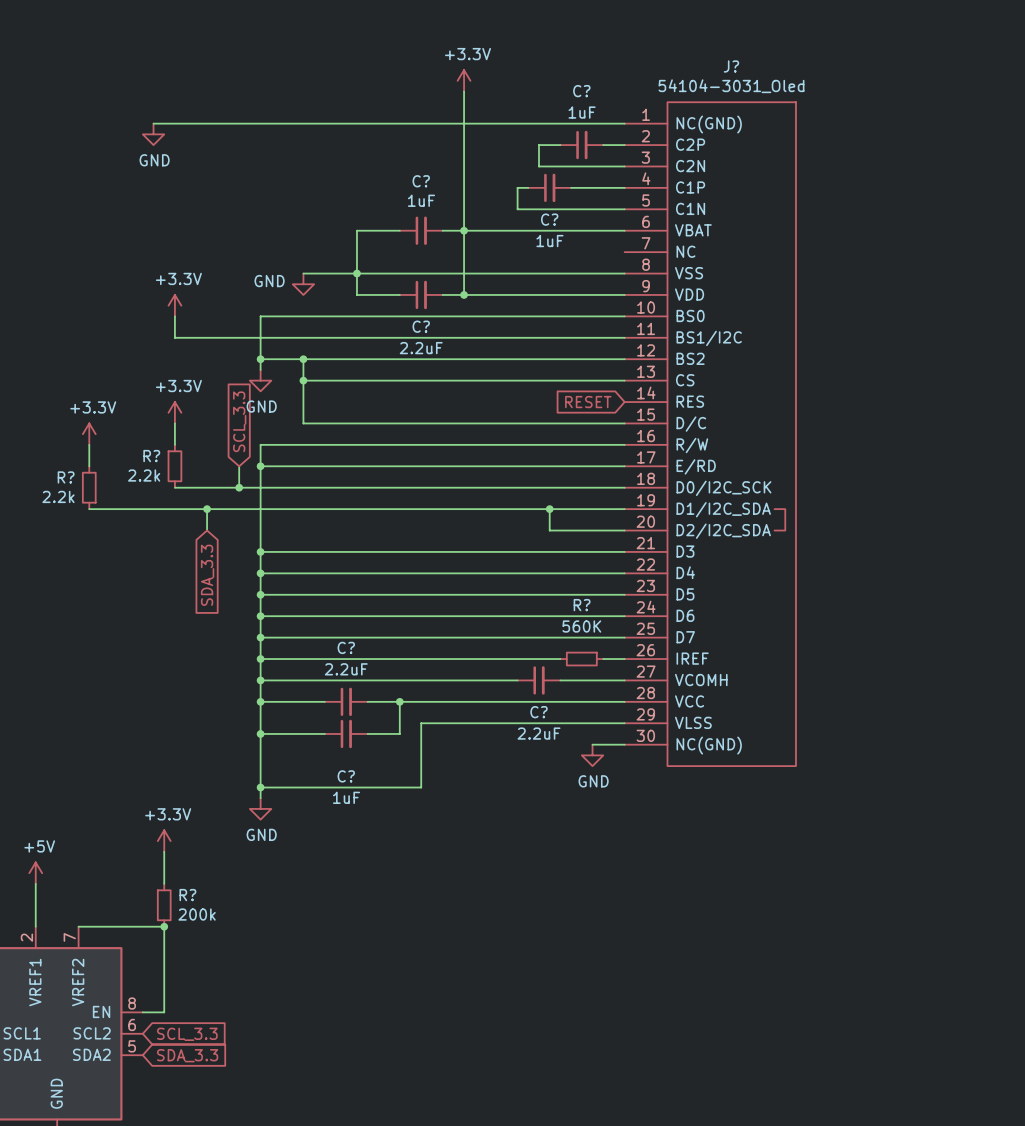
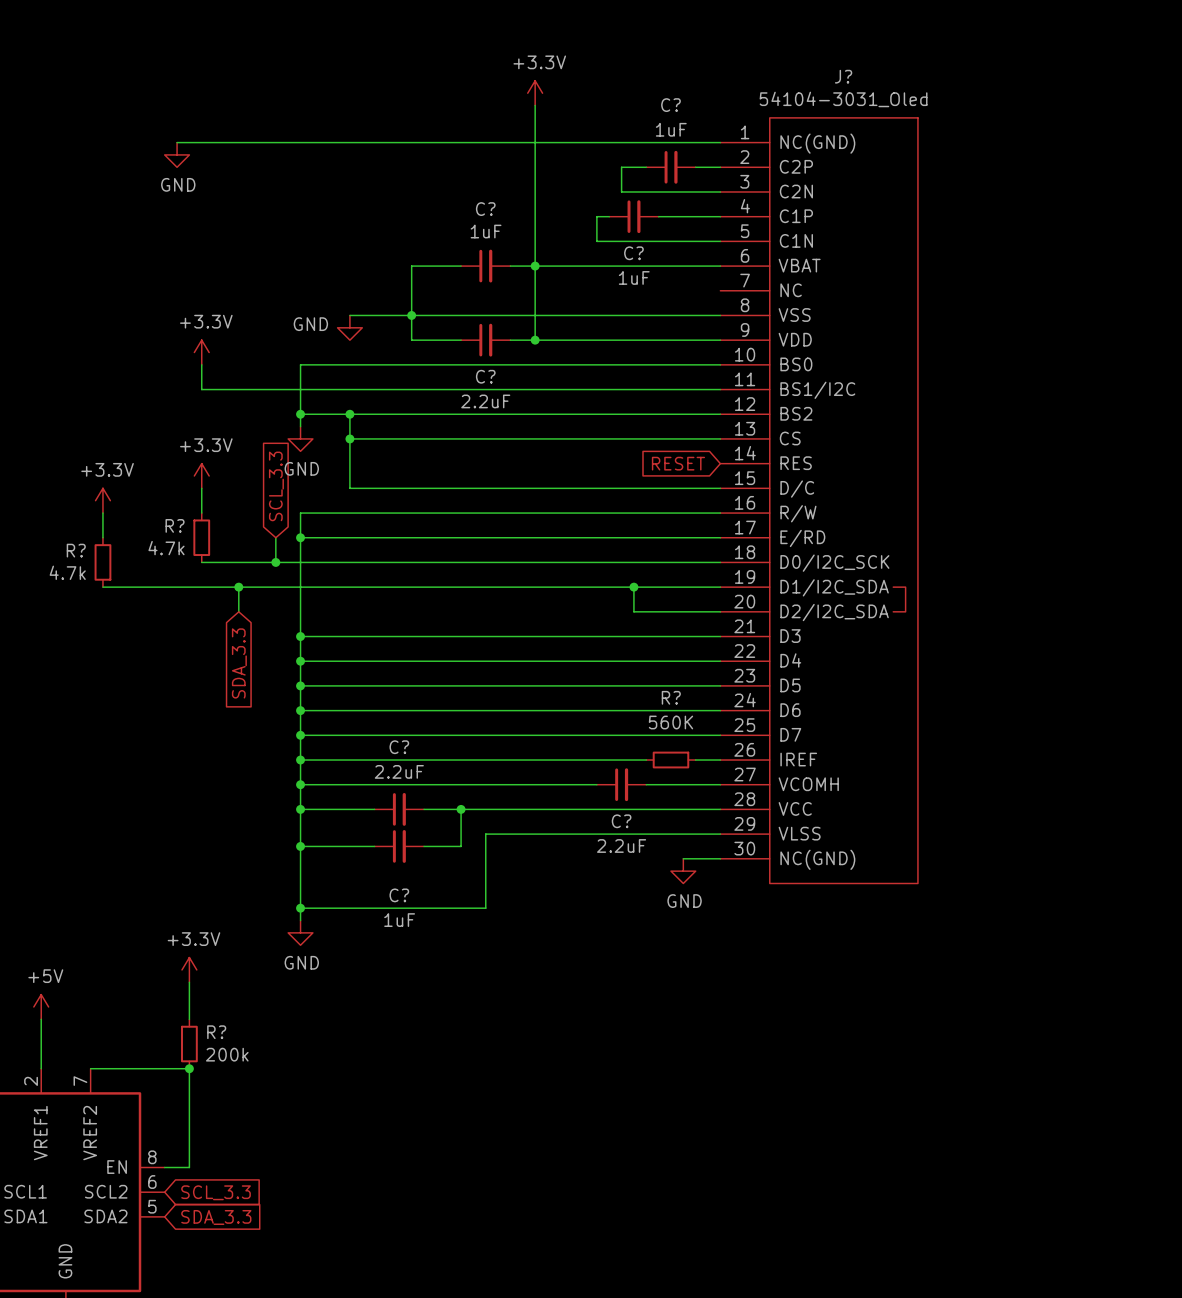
R? value: 2.2k (144, 475) -> 4.7k (166, 548)
R? value: 2.2k (58, 496) -> 4.7k (67, 572)

